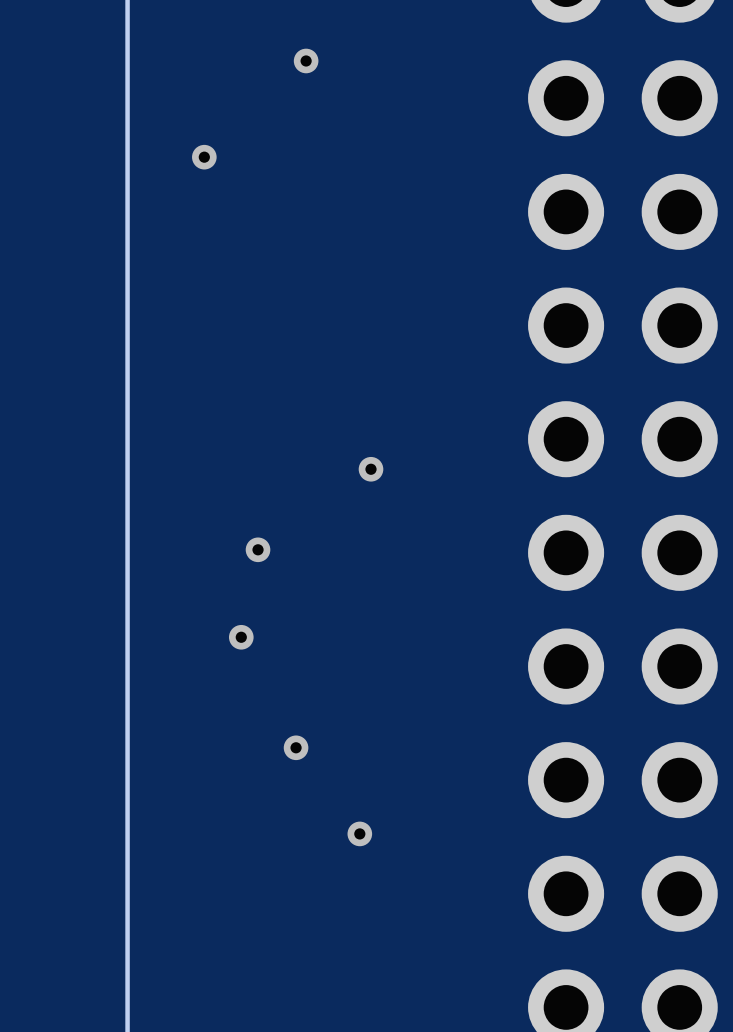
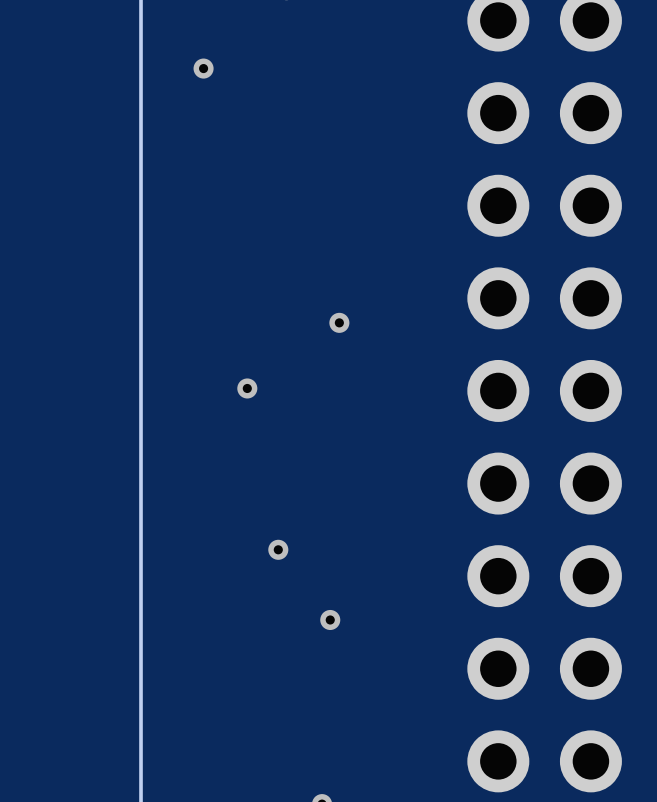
via: (241, 637) -> none

